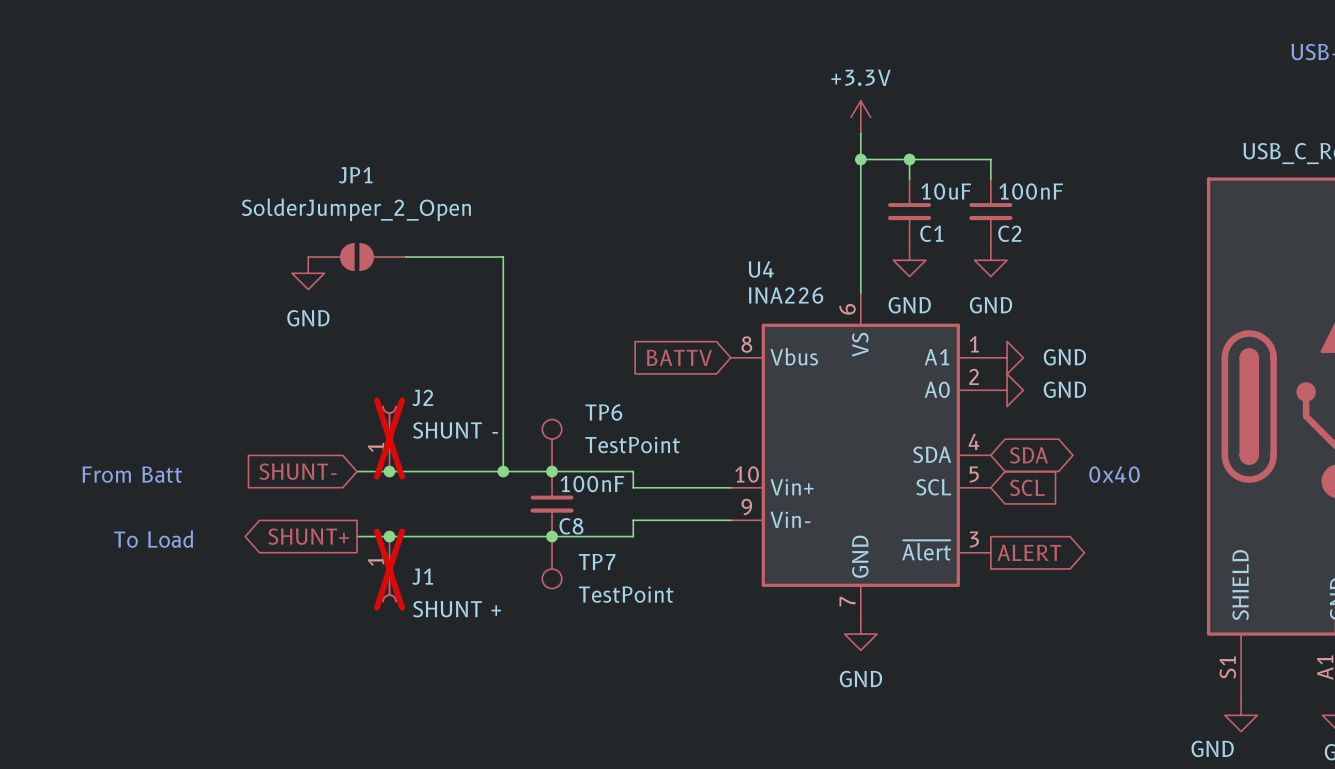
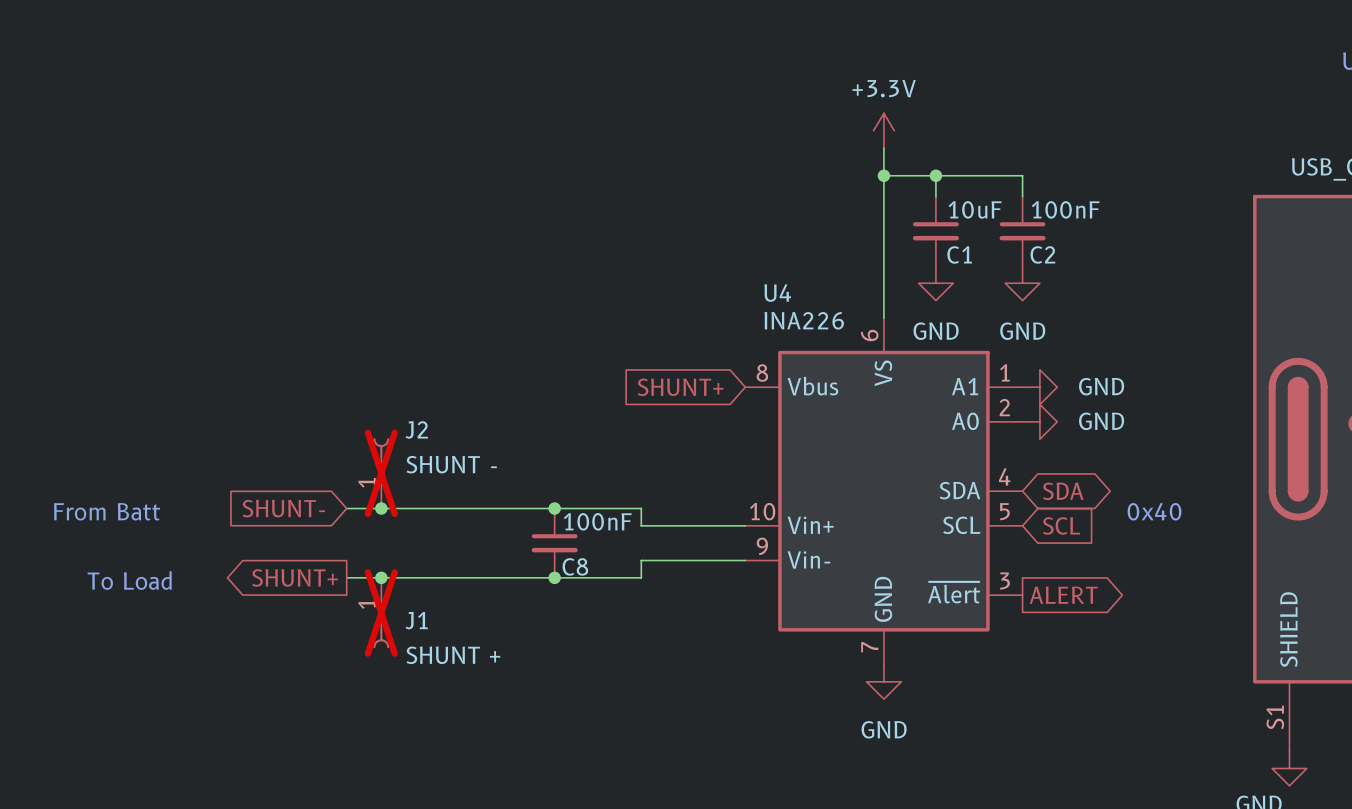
JP1: SolderJumper_2_Open (357, 257) -> none
wire: (405, 257) (503, 257) (503, 471) -> none
power symbol: GND (308, 273) -> none
global label: BATTV (679, 357) -> SHUNT+ (680, 387)
TP6: TestPoint (552, 445) -> none
junction: (503, 471) -> none
TP7: TestPoint (552, 562) -> none

